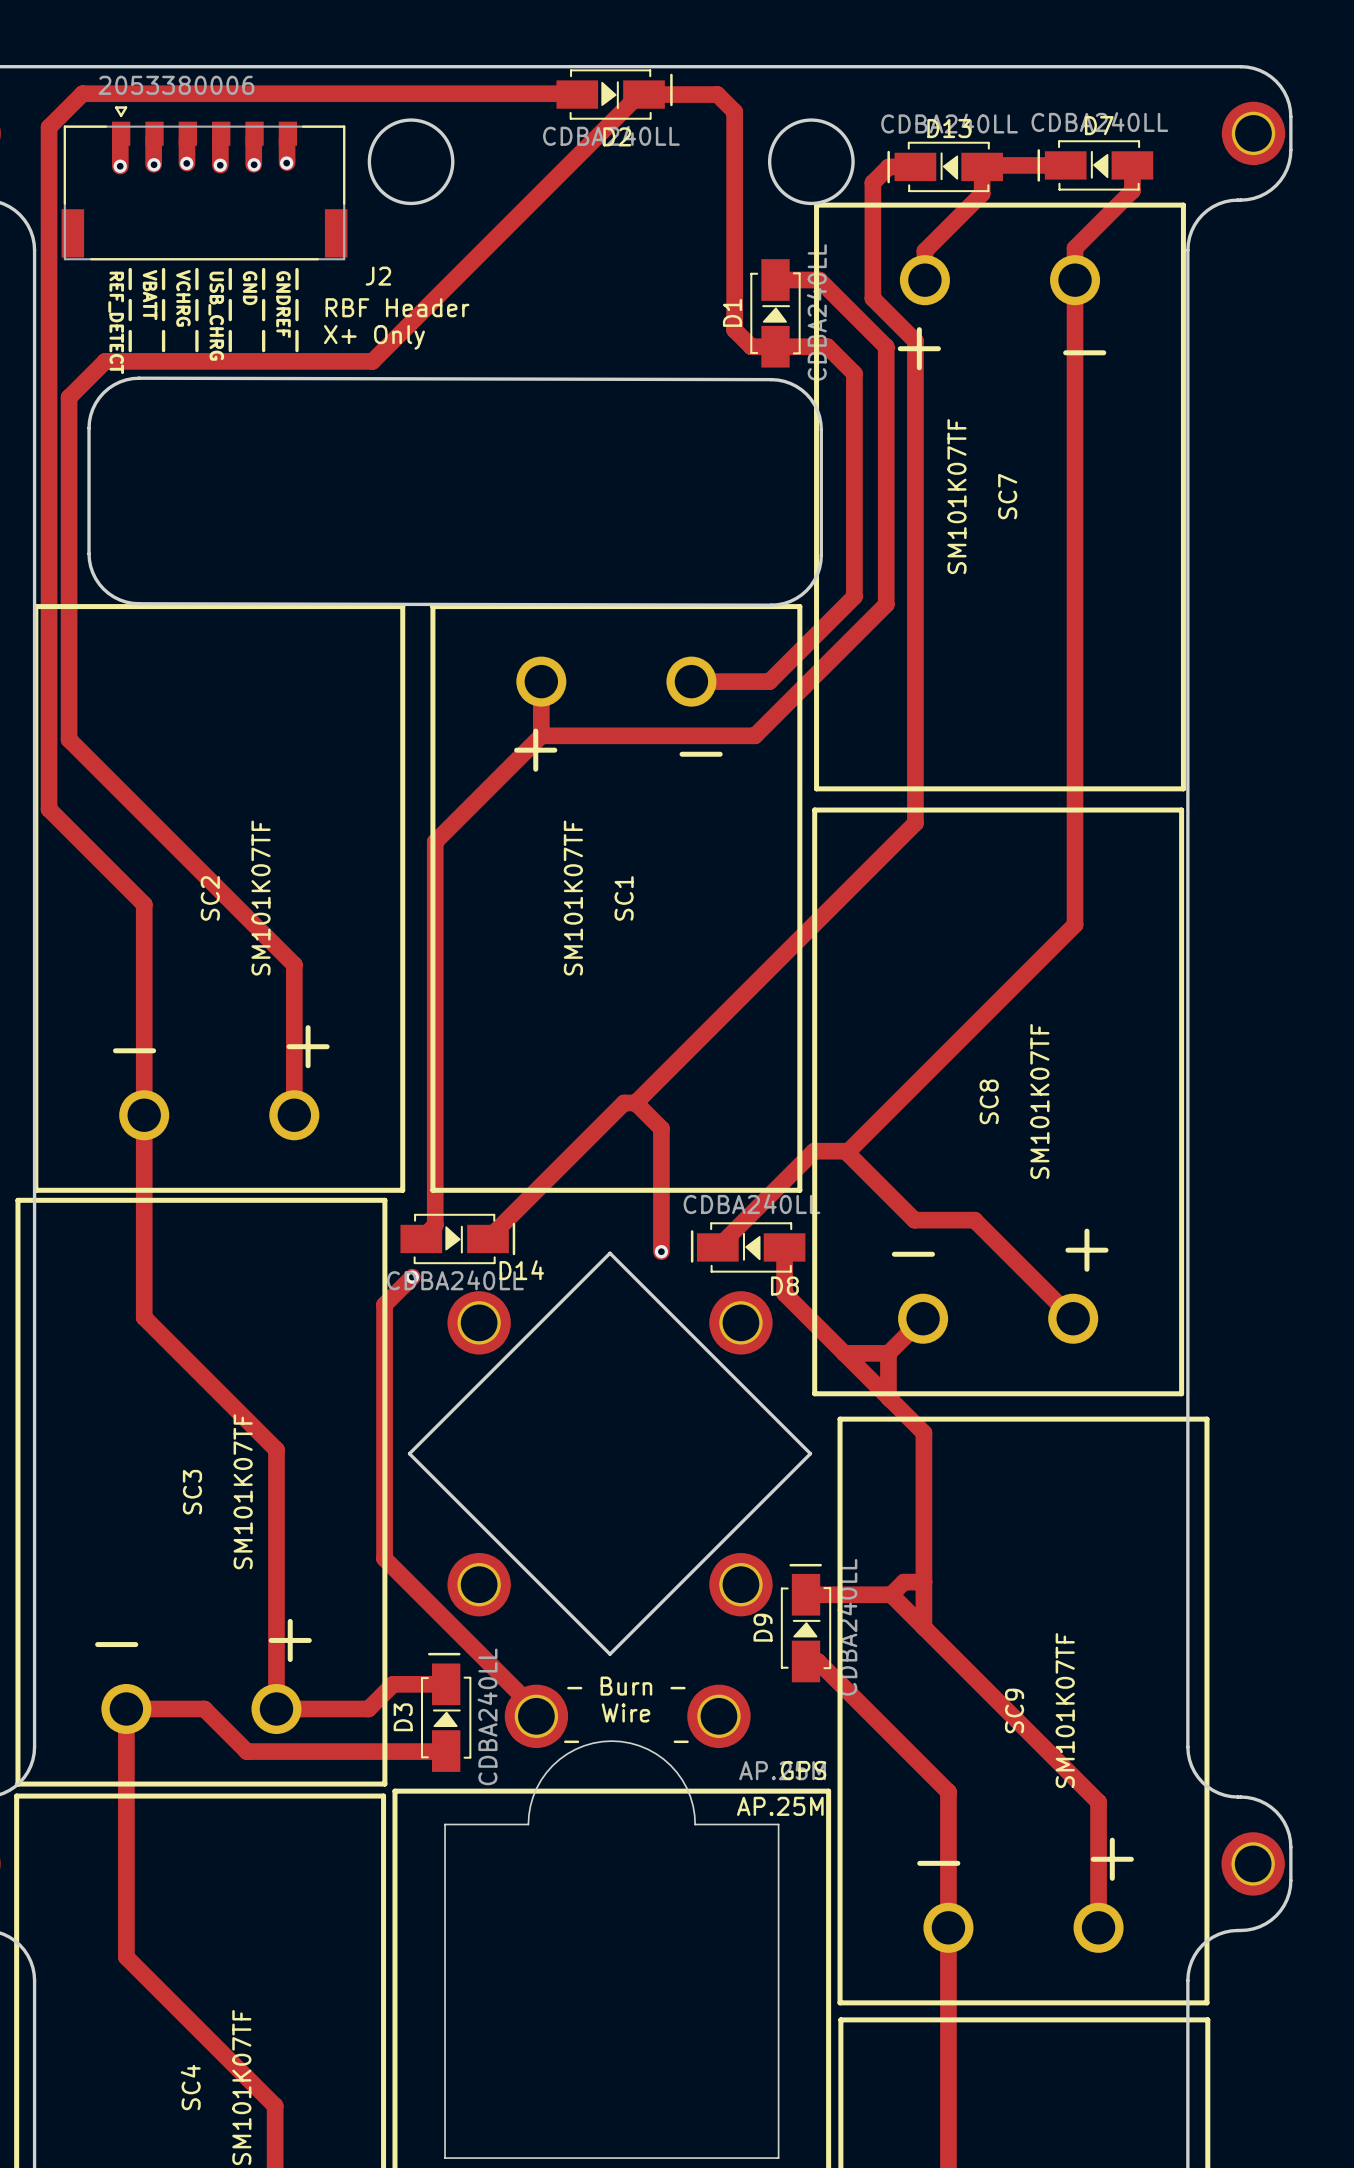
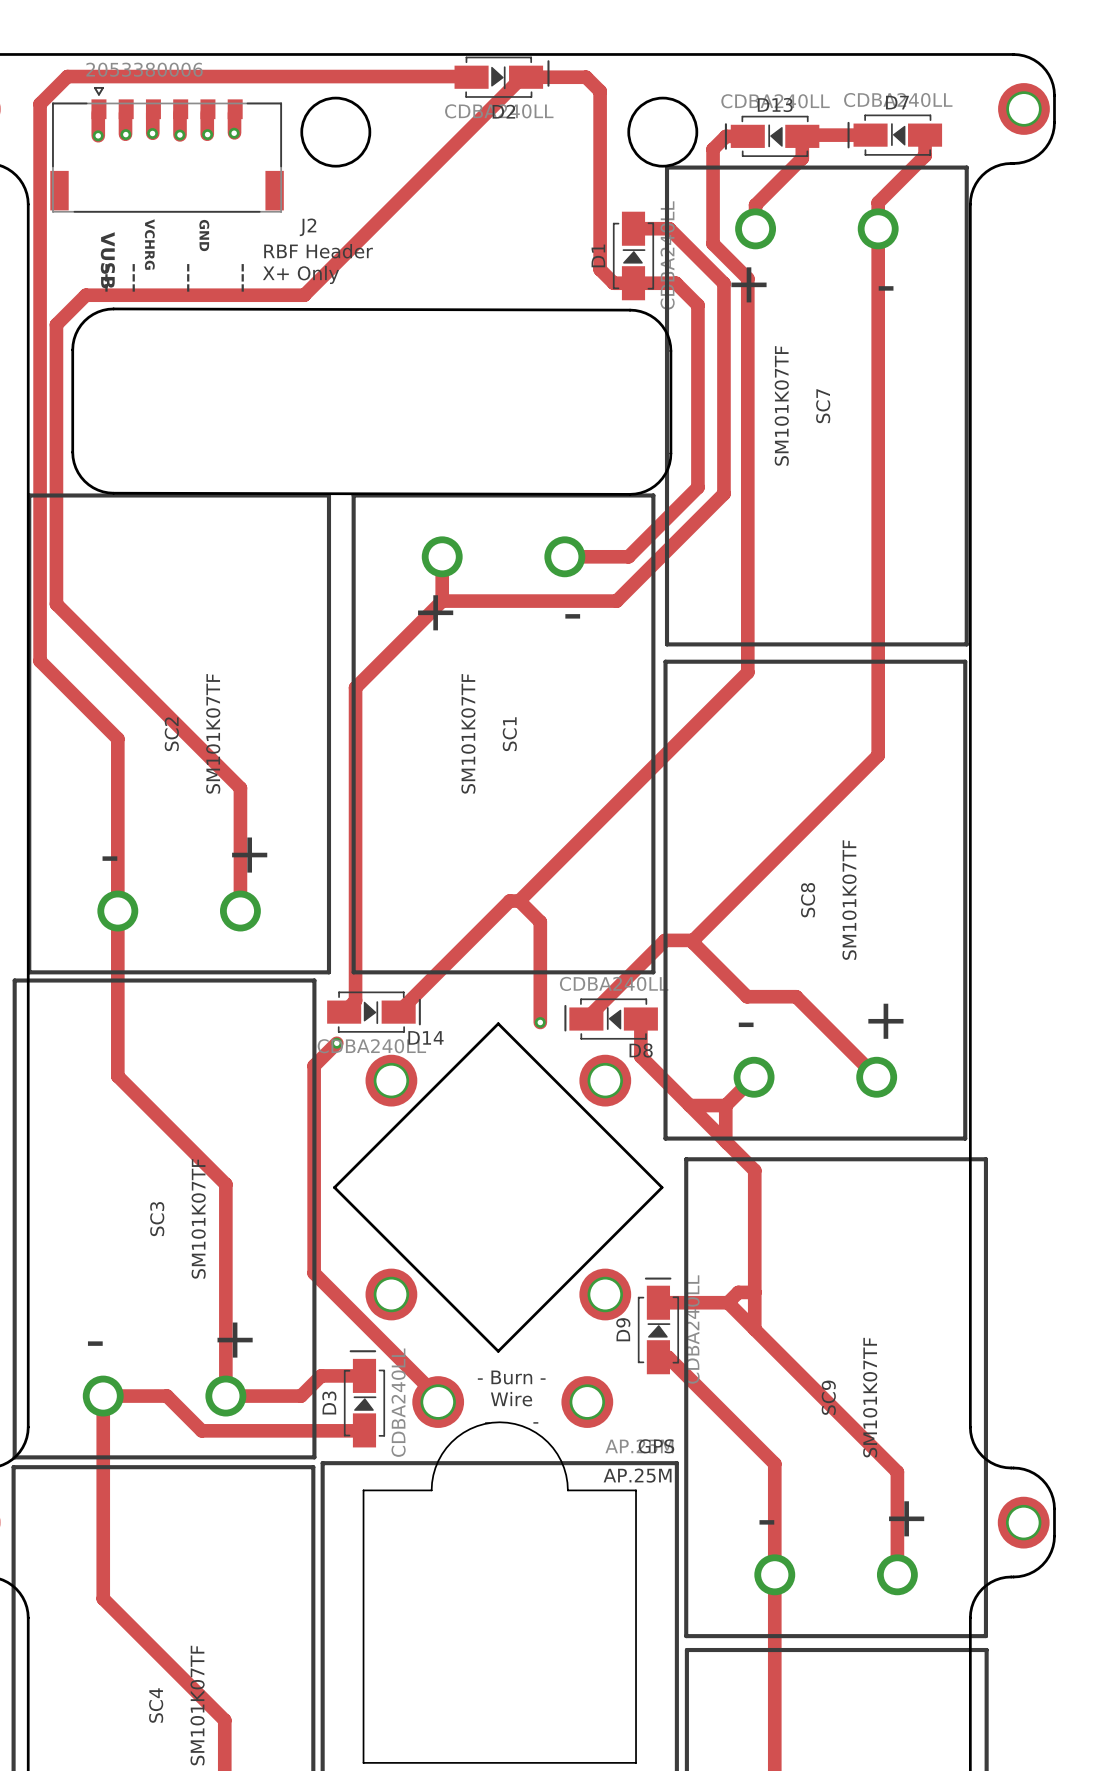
text: VBATT (150, 295) -> none
text: GNDREF (283, 304) -> none
text: --- (196, 310) -> none
text: --- (263, 310) -> none
text: USB_CHRG (216, 316) -> none
text: none -> VUSB (107, 260)
text: REF_DETECT (116, 322) -> none

